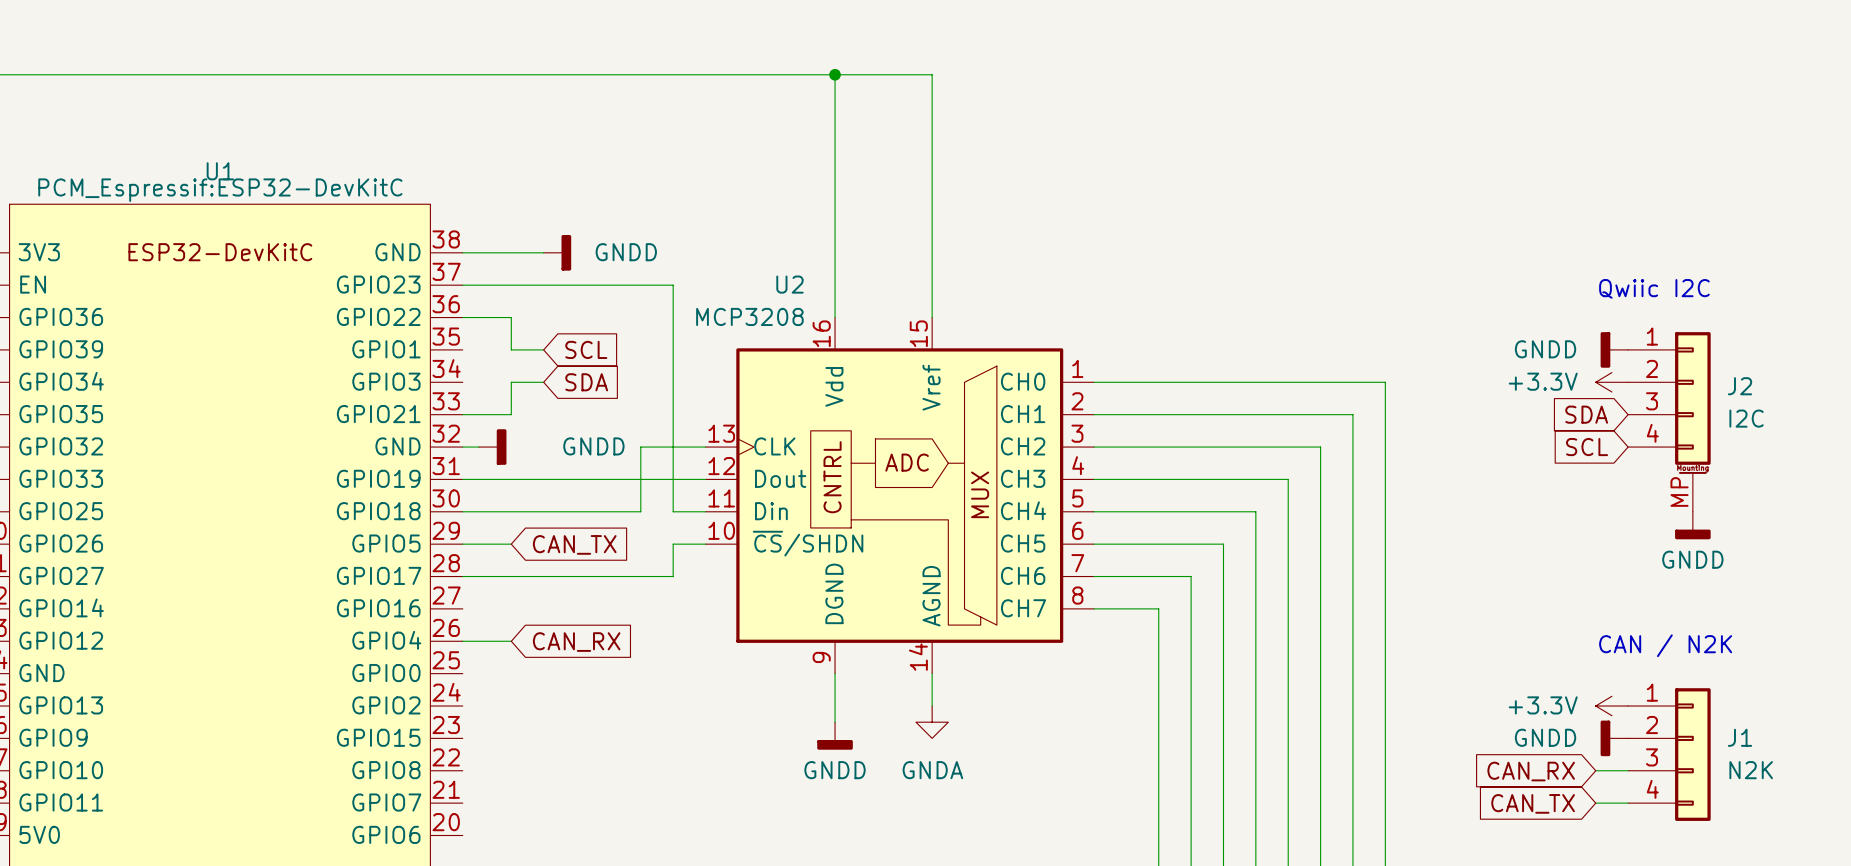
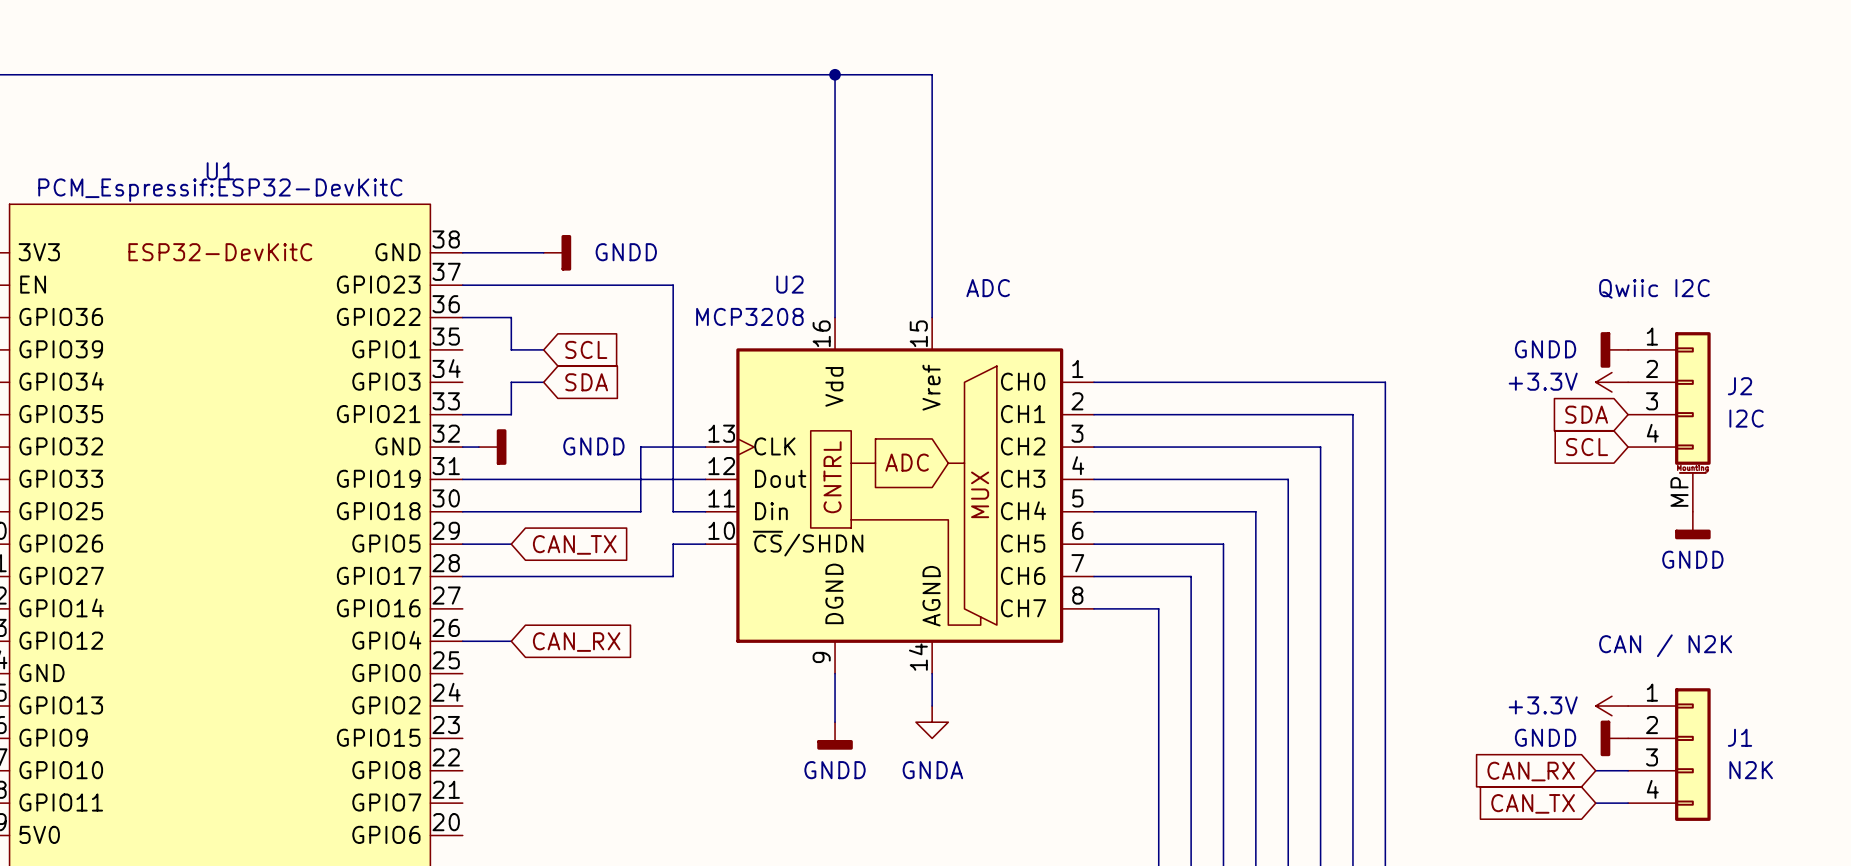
text: none -> ADC (988, 288)

